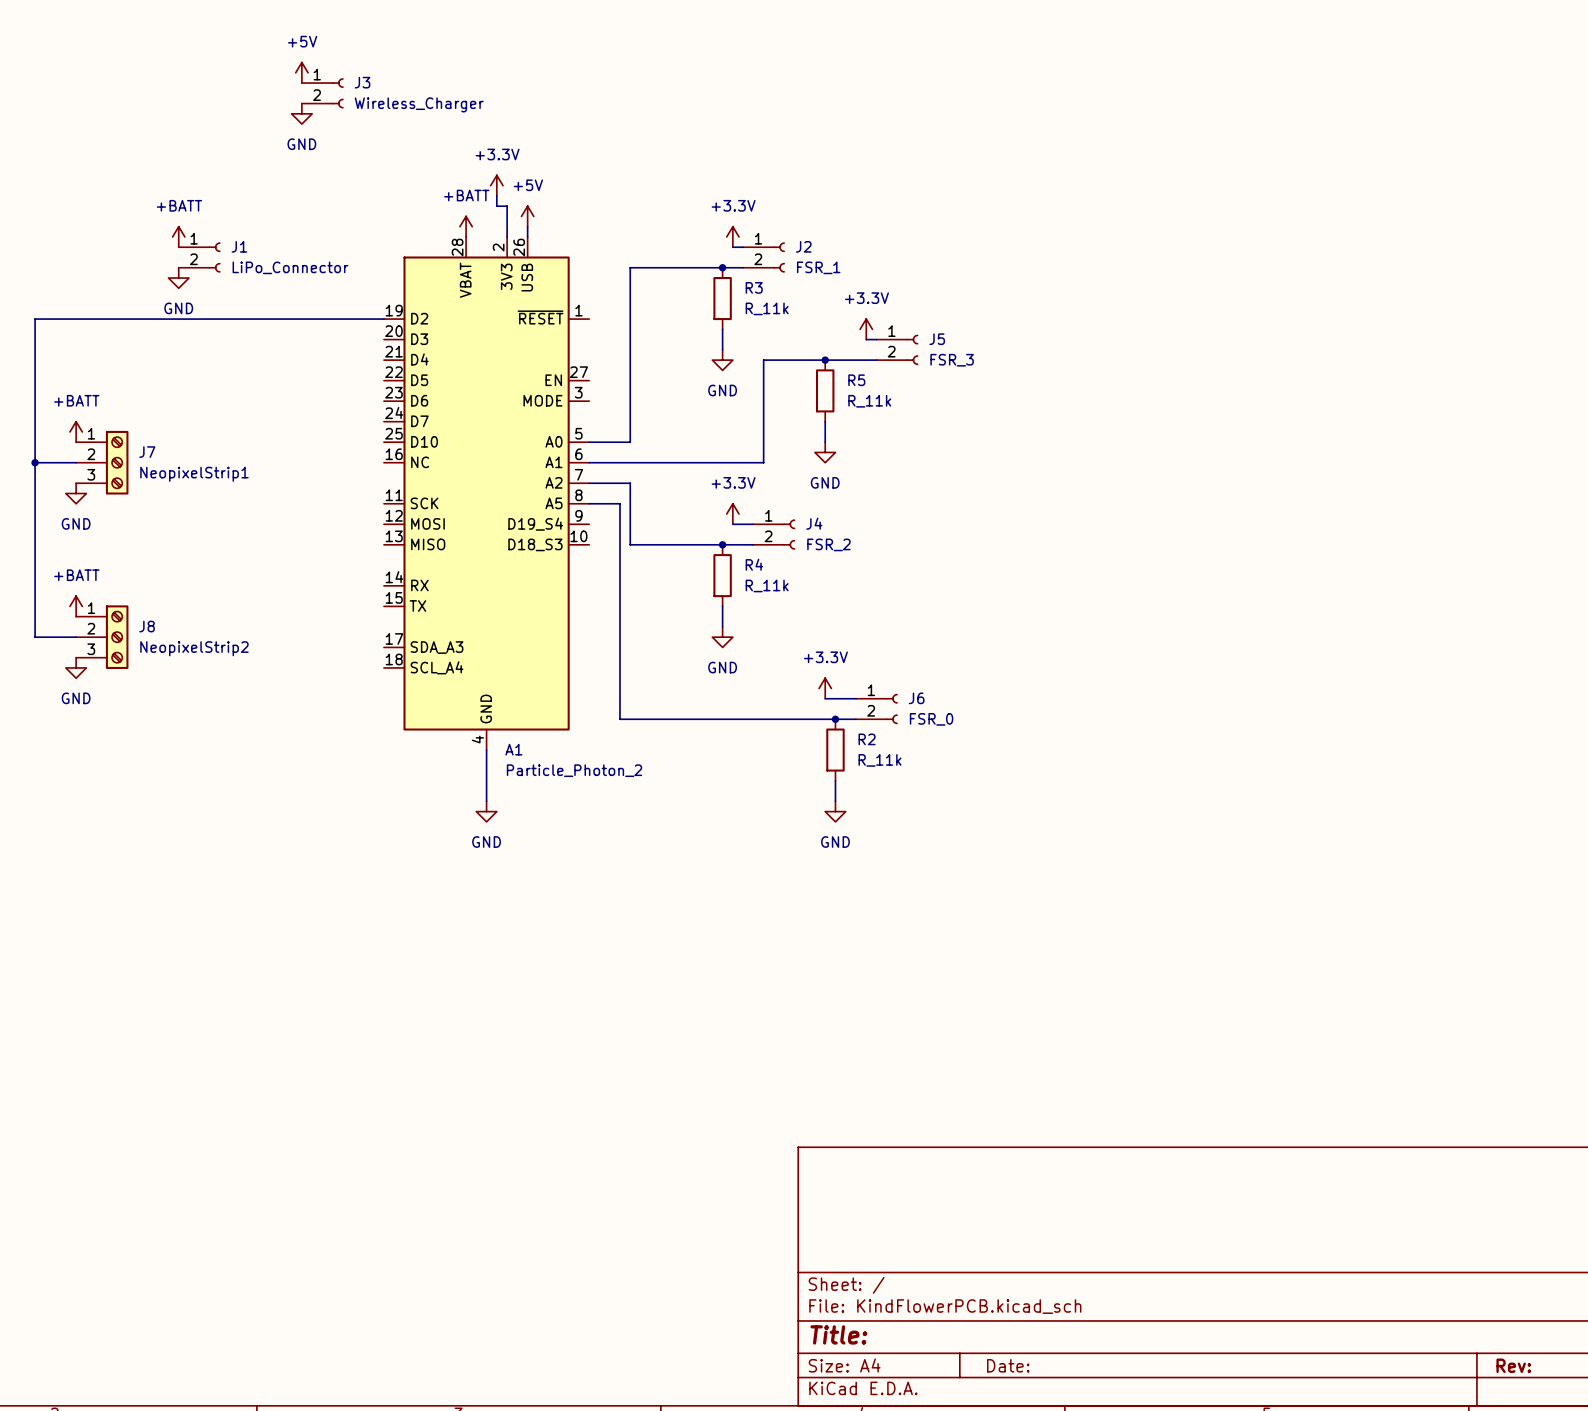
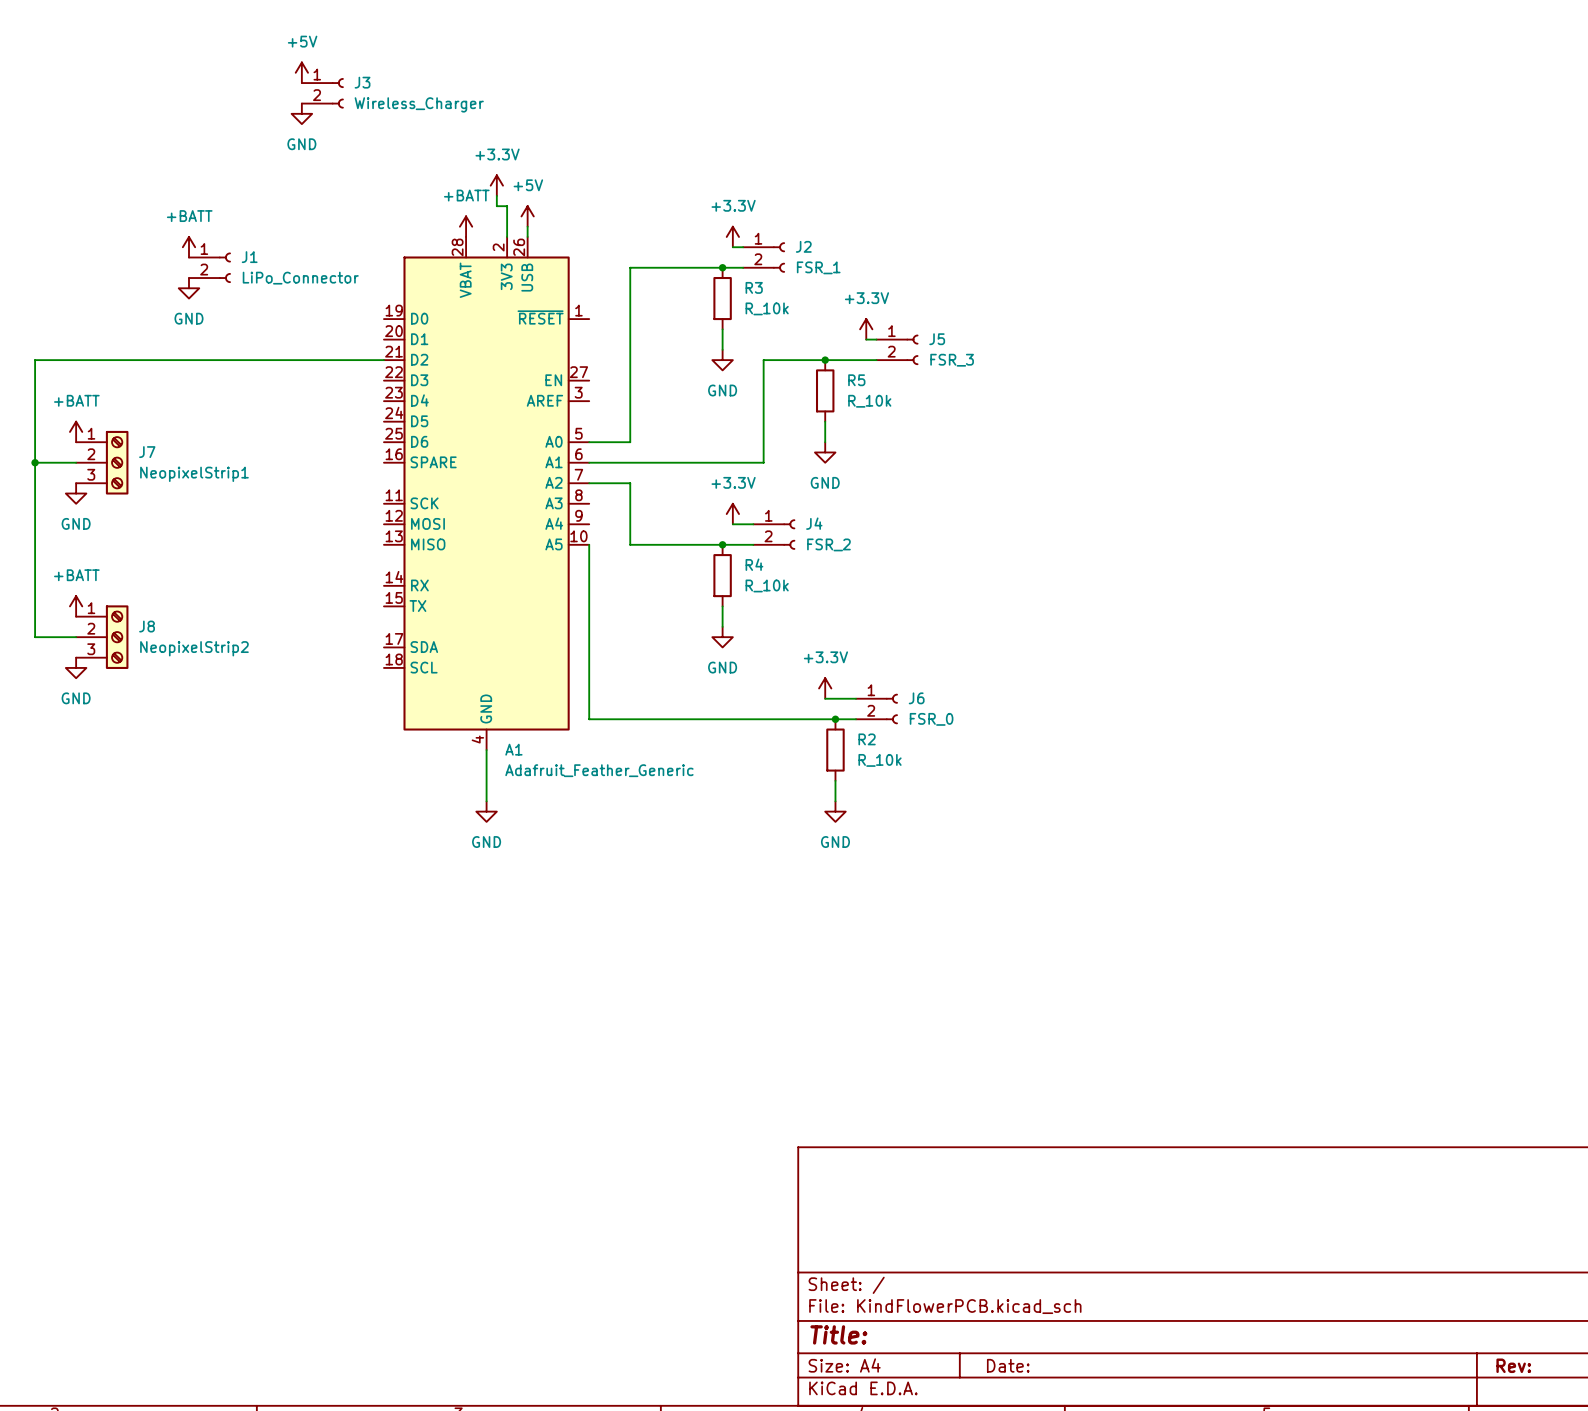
power symbol position: +BATT (178, 236) -> +BATT (189, 247)
A1 symbol: [383, 236, 590, 751] -> [383, 236, 590, 751]
J1 position: (199, 257) -> (209, 267)
power symbol position: GND (178, 278) -> GND (189, 288)
R3 value: R_11k (767, 308) -> R_10k (767, 308)
wire: (383, 319) (35, 319) (35, 360) -> (383, 360) (35, 360)
R5 value: R_11k (869, 401) -> R_10k (869, 401)
wire: (589, 503) (619, 503) (619, 719) -> (589, 544) (589, 719) (619, 719)
R4 value: R_11k (767, 585) -> R_10k (767, 585)
R2 value: R_11k (880, 760) -> R_10k (880, 760)
A1 value: Particle_Photon_2 (574, 770) -> Adafruit_Feather_Generic (599, 770)

